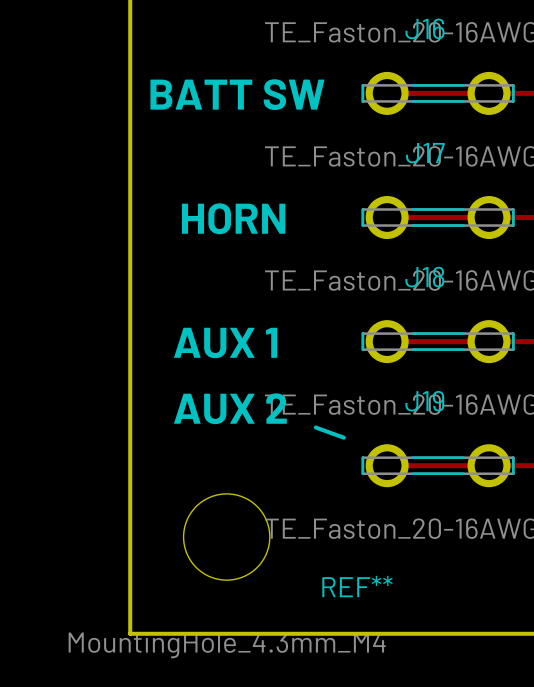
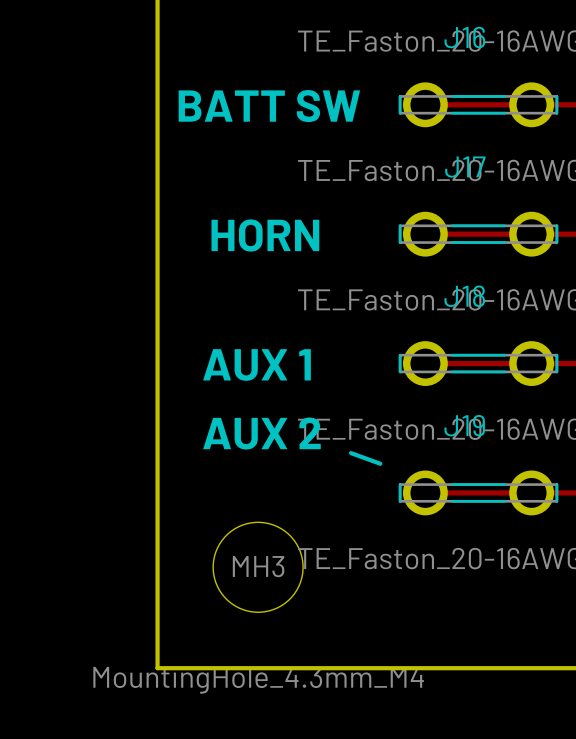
REF** name: REF** (357, 586) -> MH3 (258, 566)

